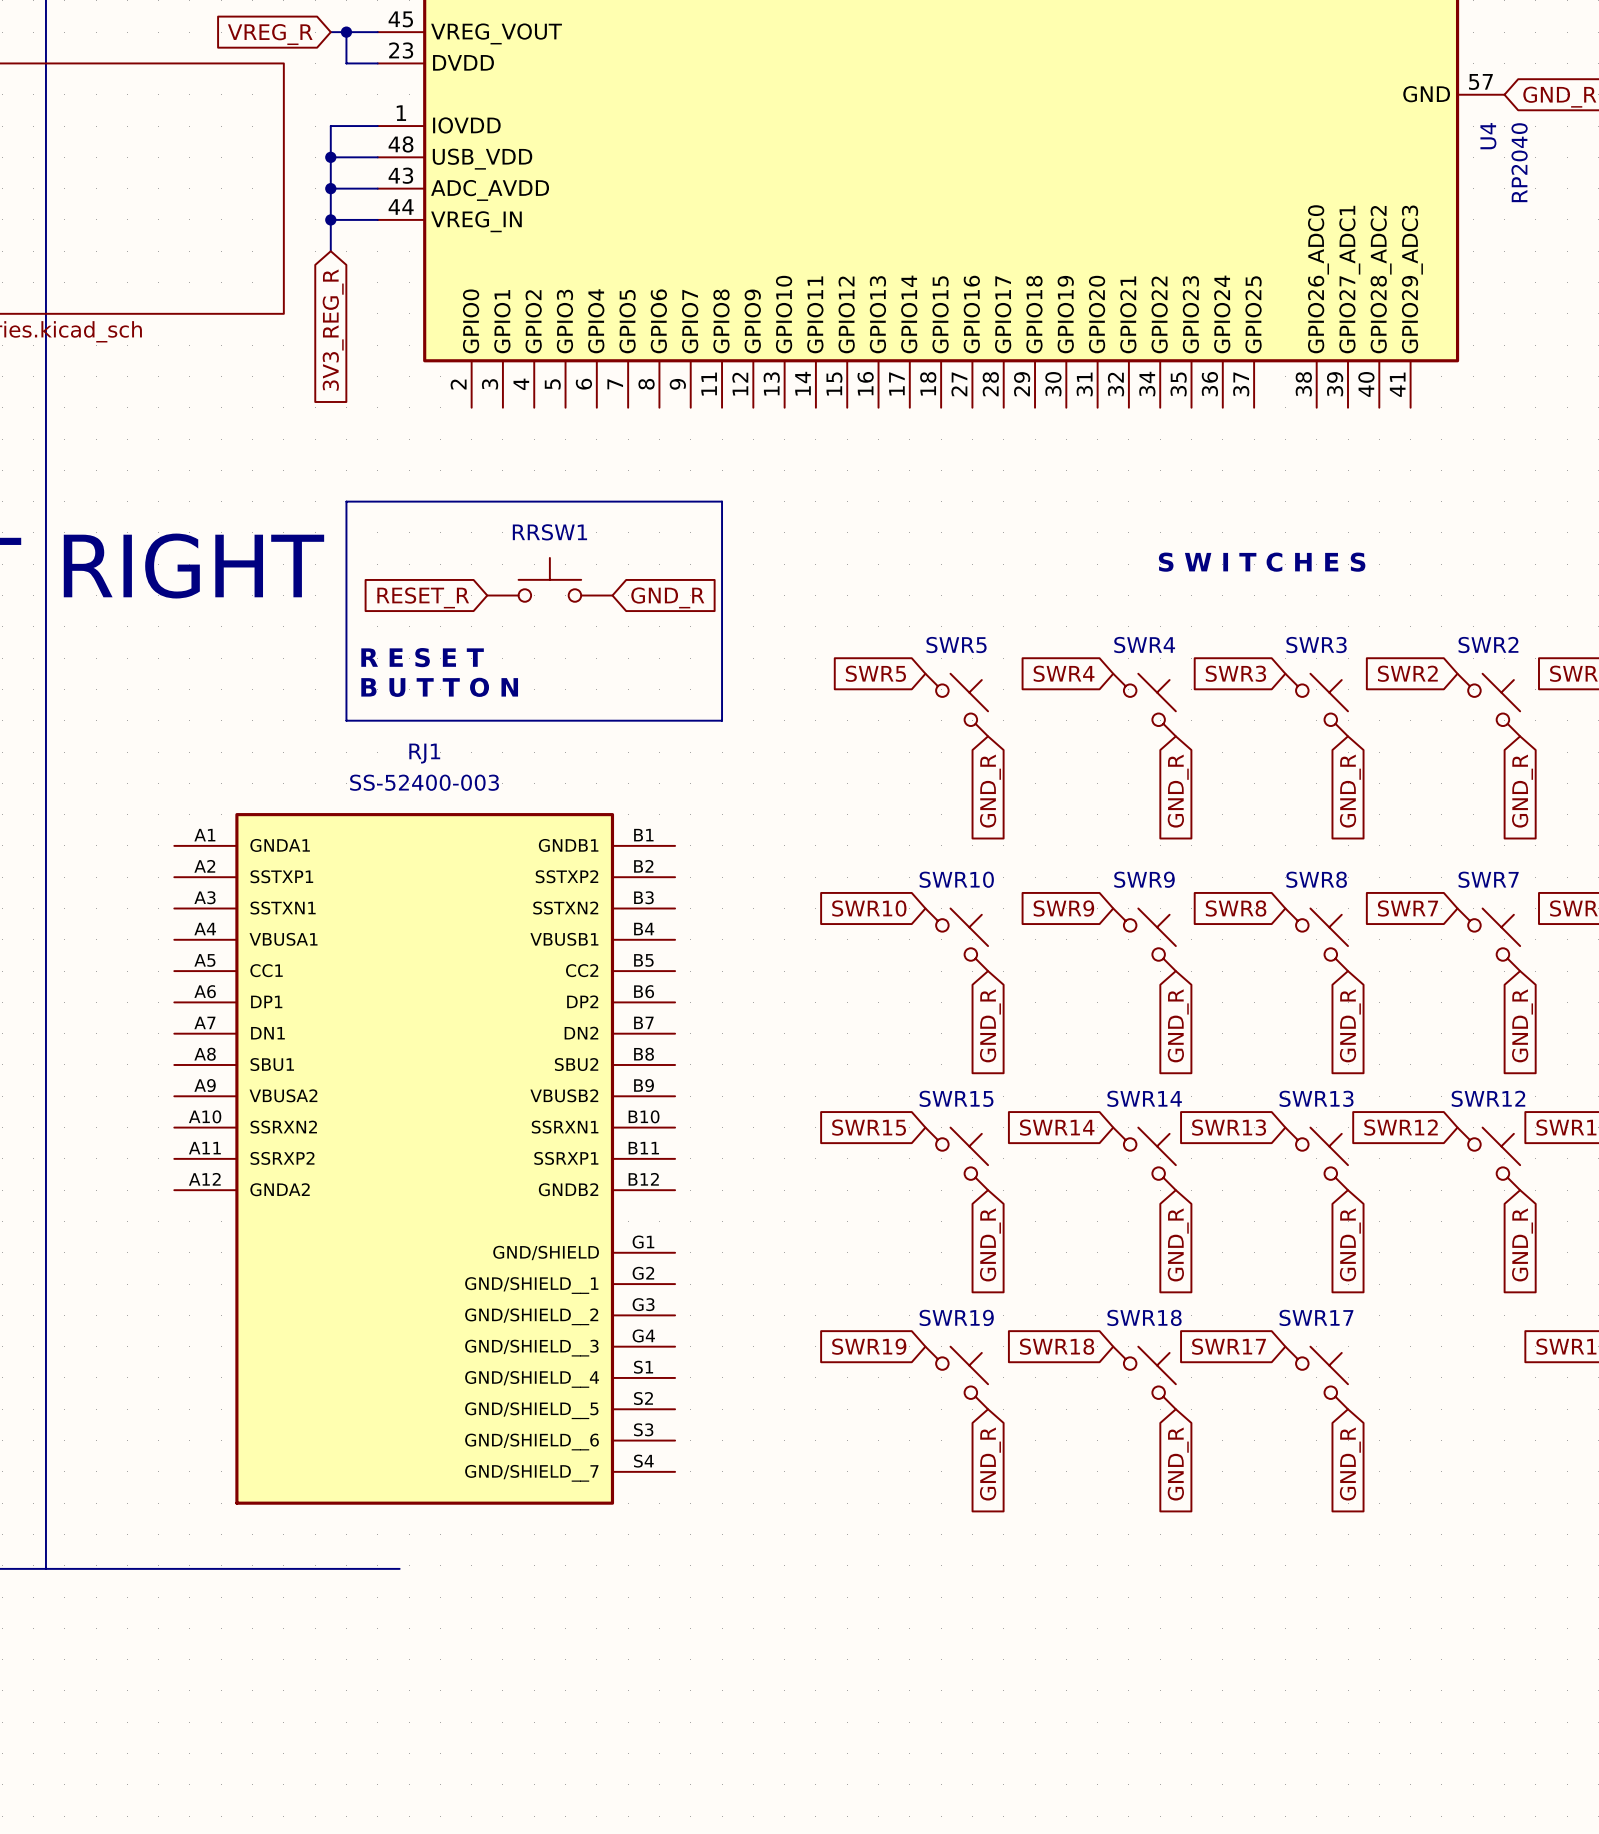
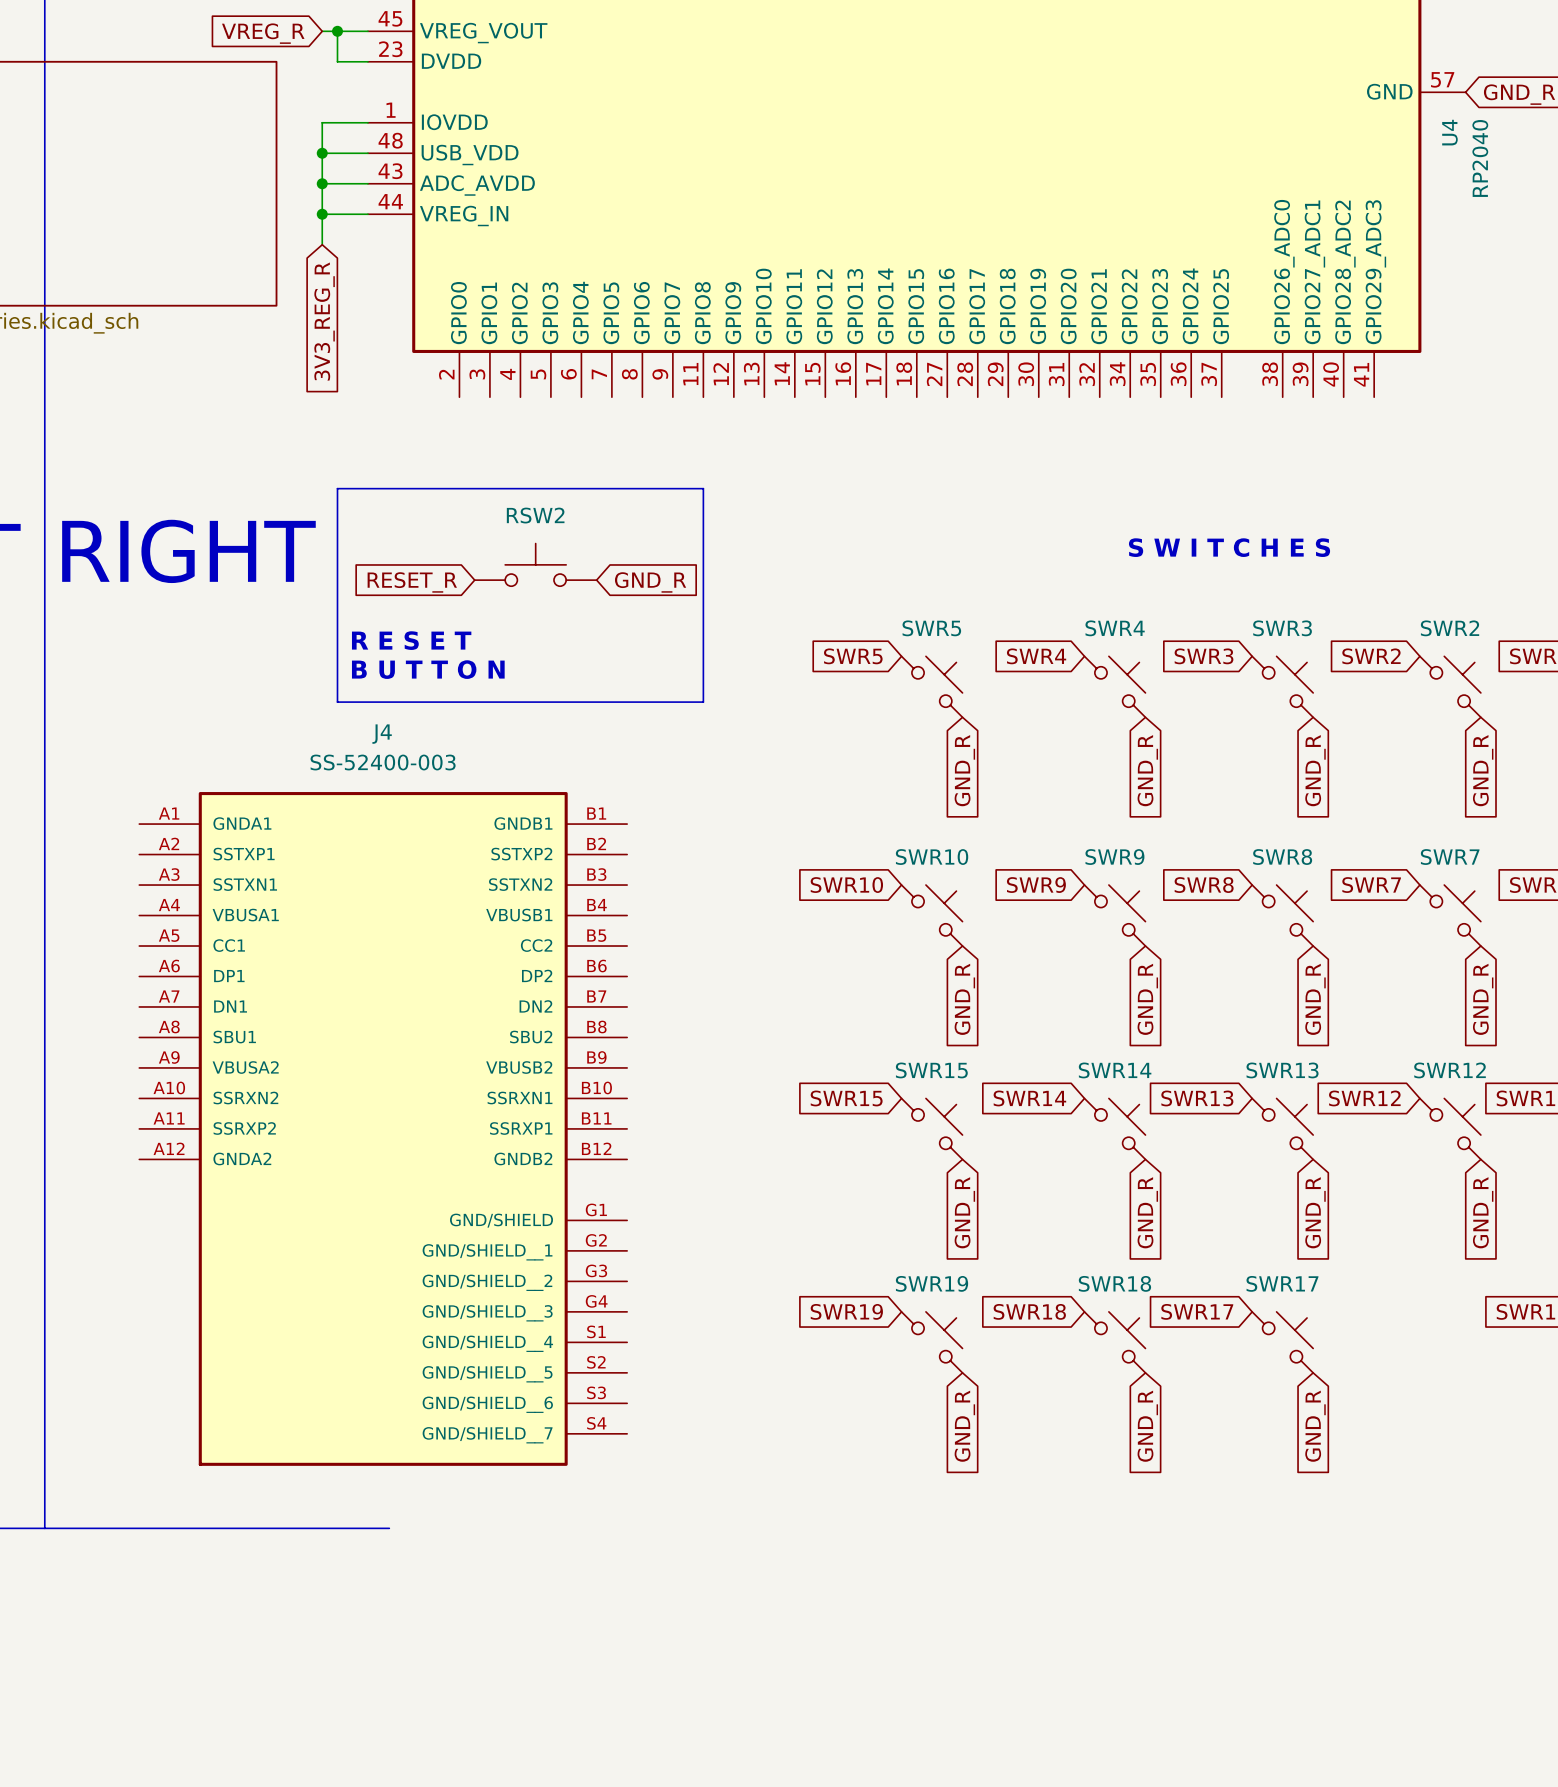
RRSW1 name: RRSW1 (549, 532) -> RSW2 (535, 515)
J4: none -> SS-52400-003 (383, 1128)
RJ1: SS-52400-003 (424, 1158) -> none

